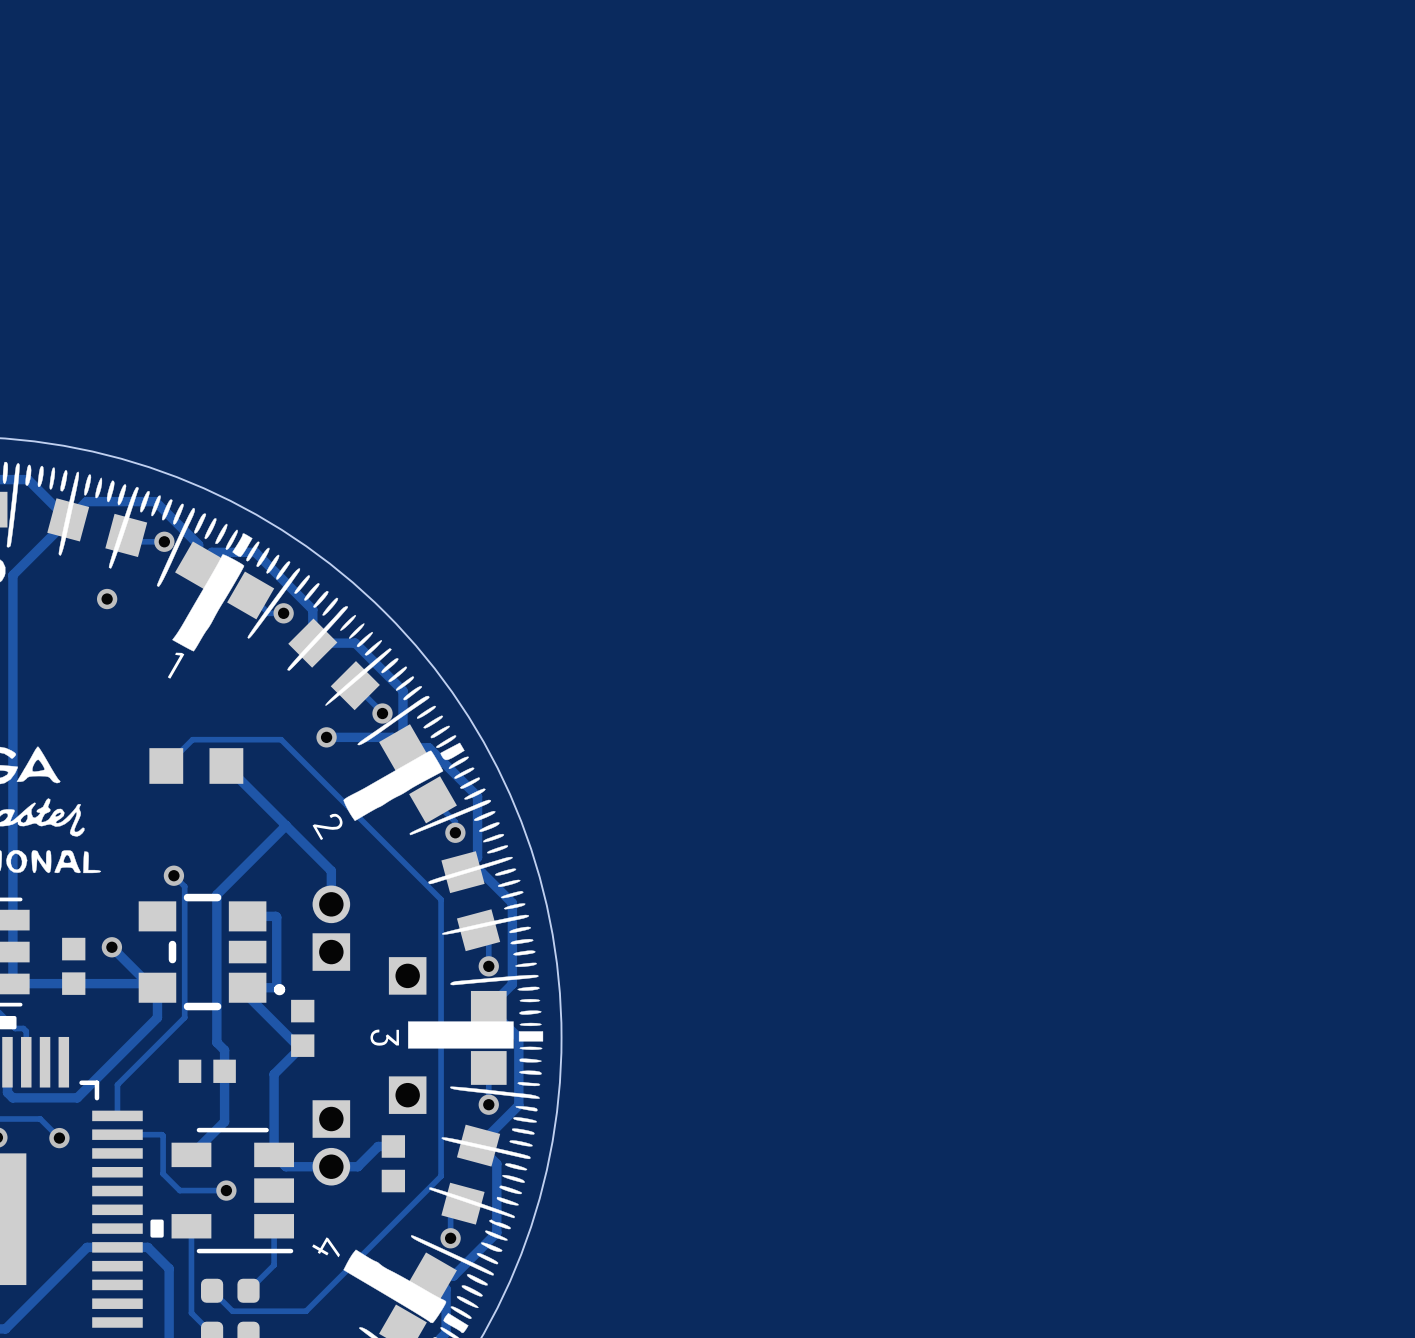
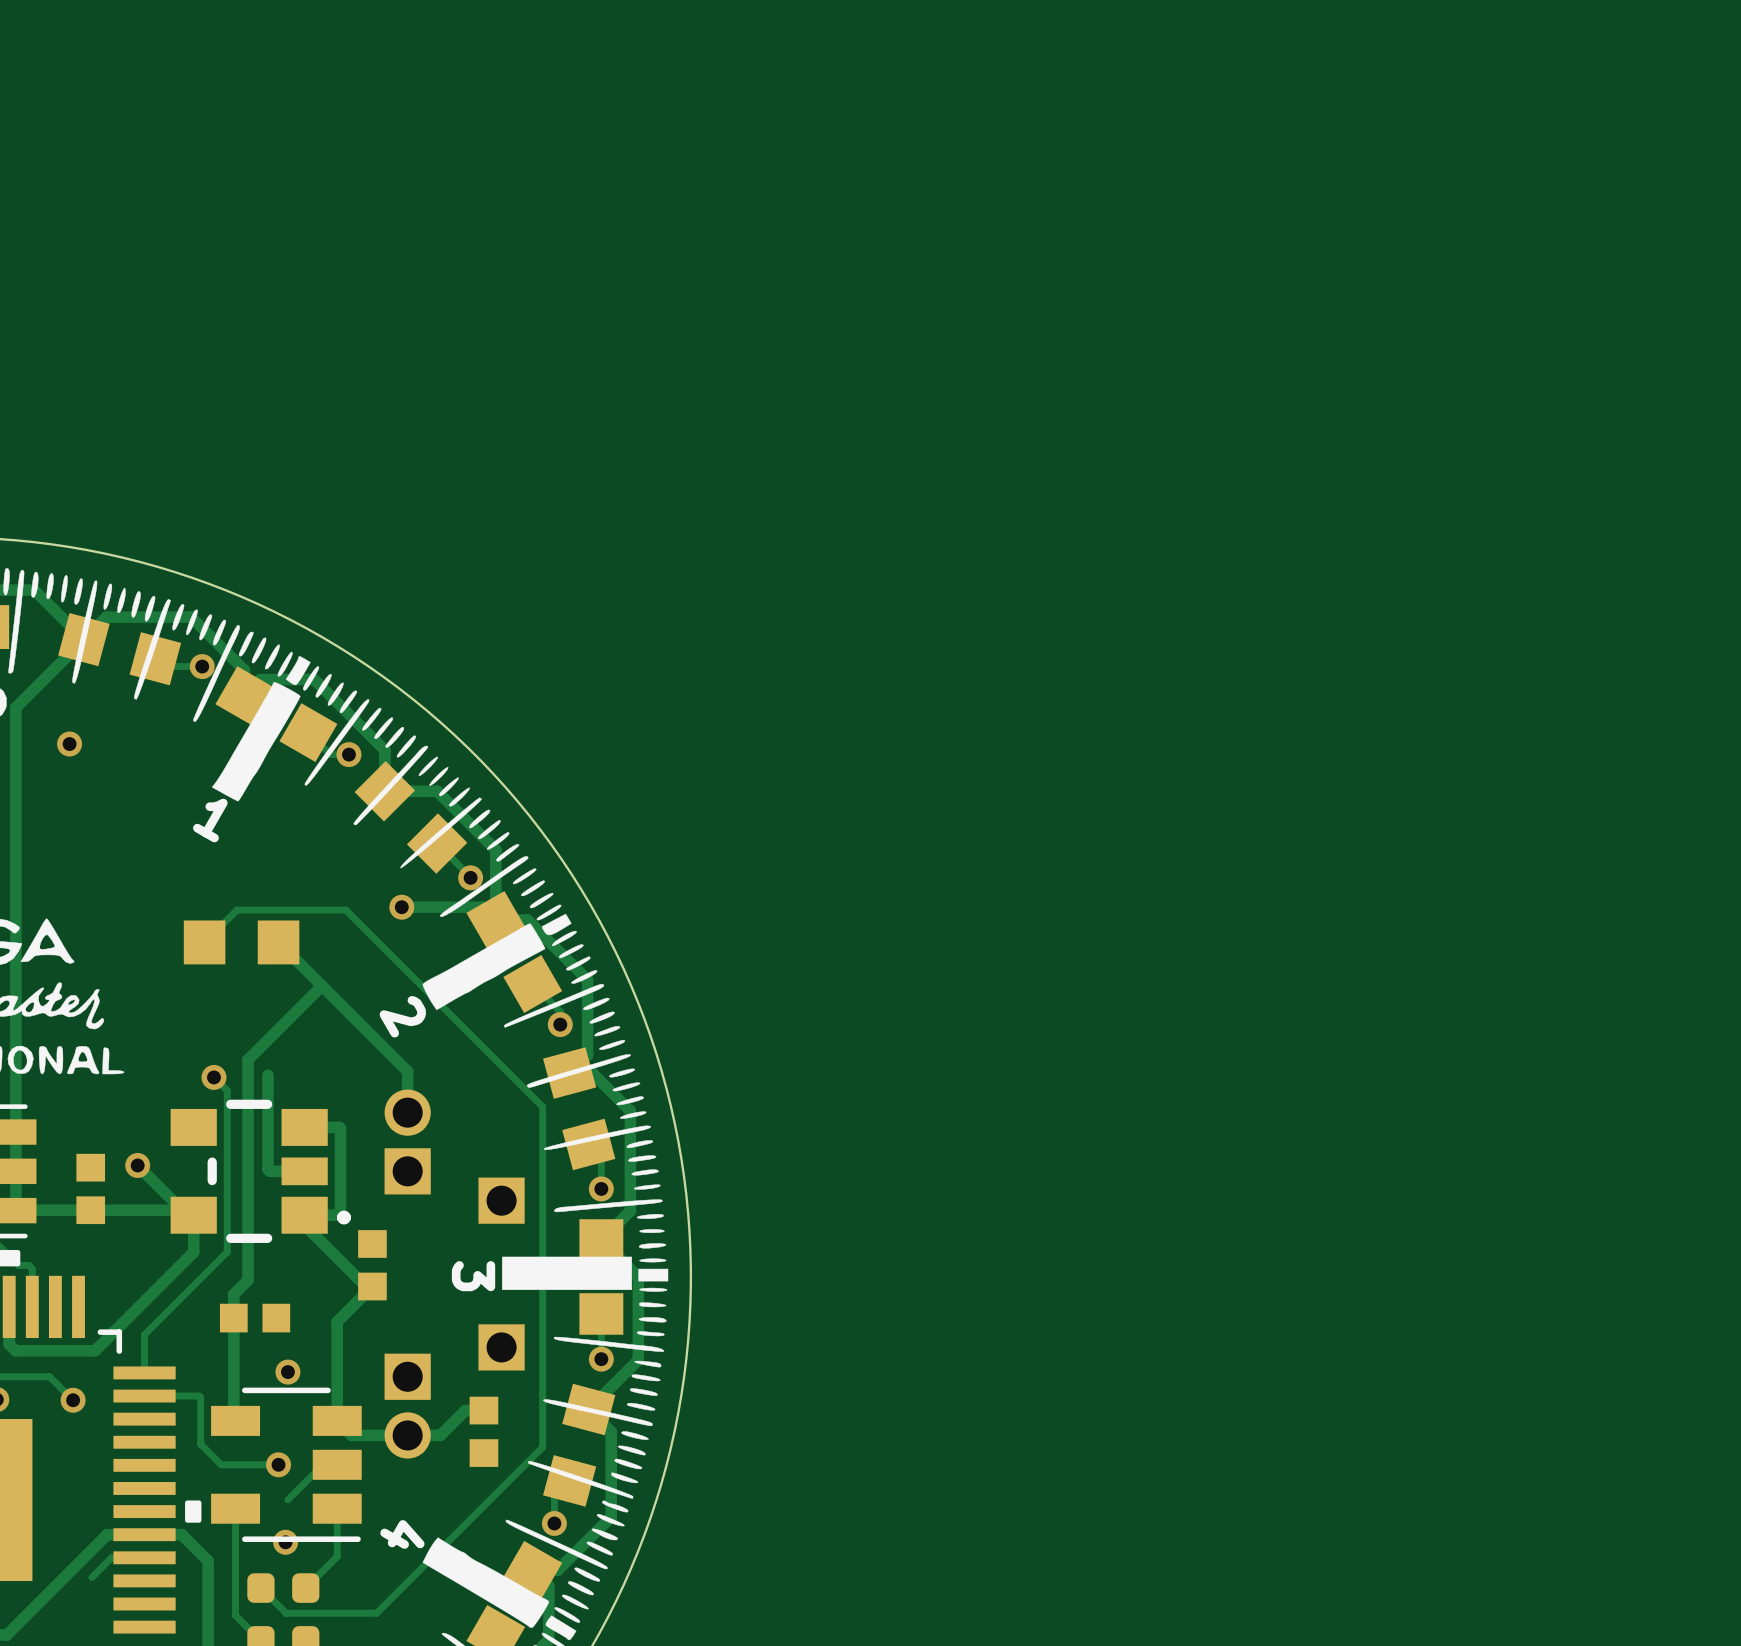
via position: (107, 599) -> (69, 744)
track: (286, 825) (216, 894) (216, 1042) (224, 1050) (224, 1121) (191, 1154) -> (321, 985) (248, 1059) (248, 1280) (233, 1294) (233, 1419) (235, 1420)
track: none -> (267, 1075) (267, 1169) (269, 1171) (304, 1171)
via: none -> (287, 1372)
track: none -> (337, 1464) (322, 1464) (287, 1499)
via: none -> (285, 1542)
track: none -> (144, 1557) (111, 1557) (91, 1577)

